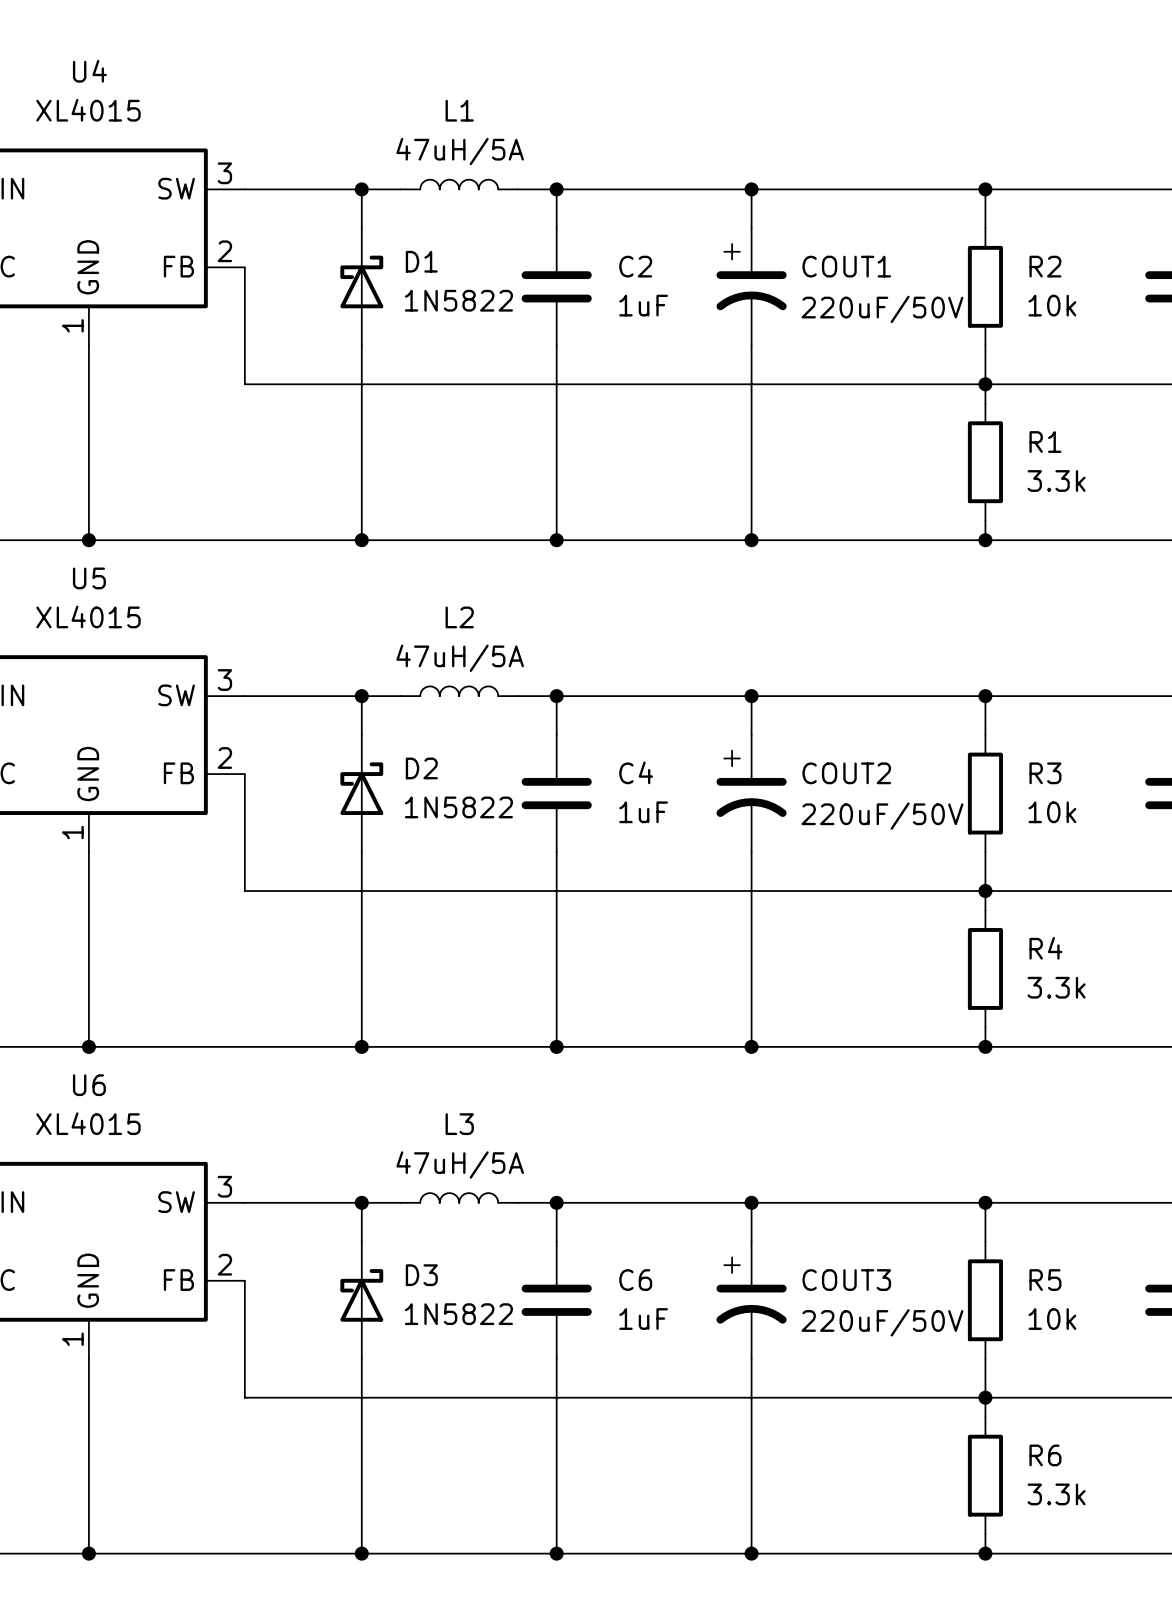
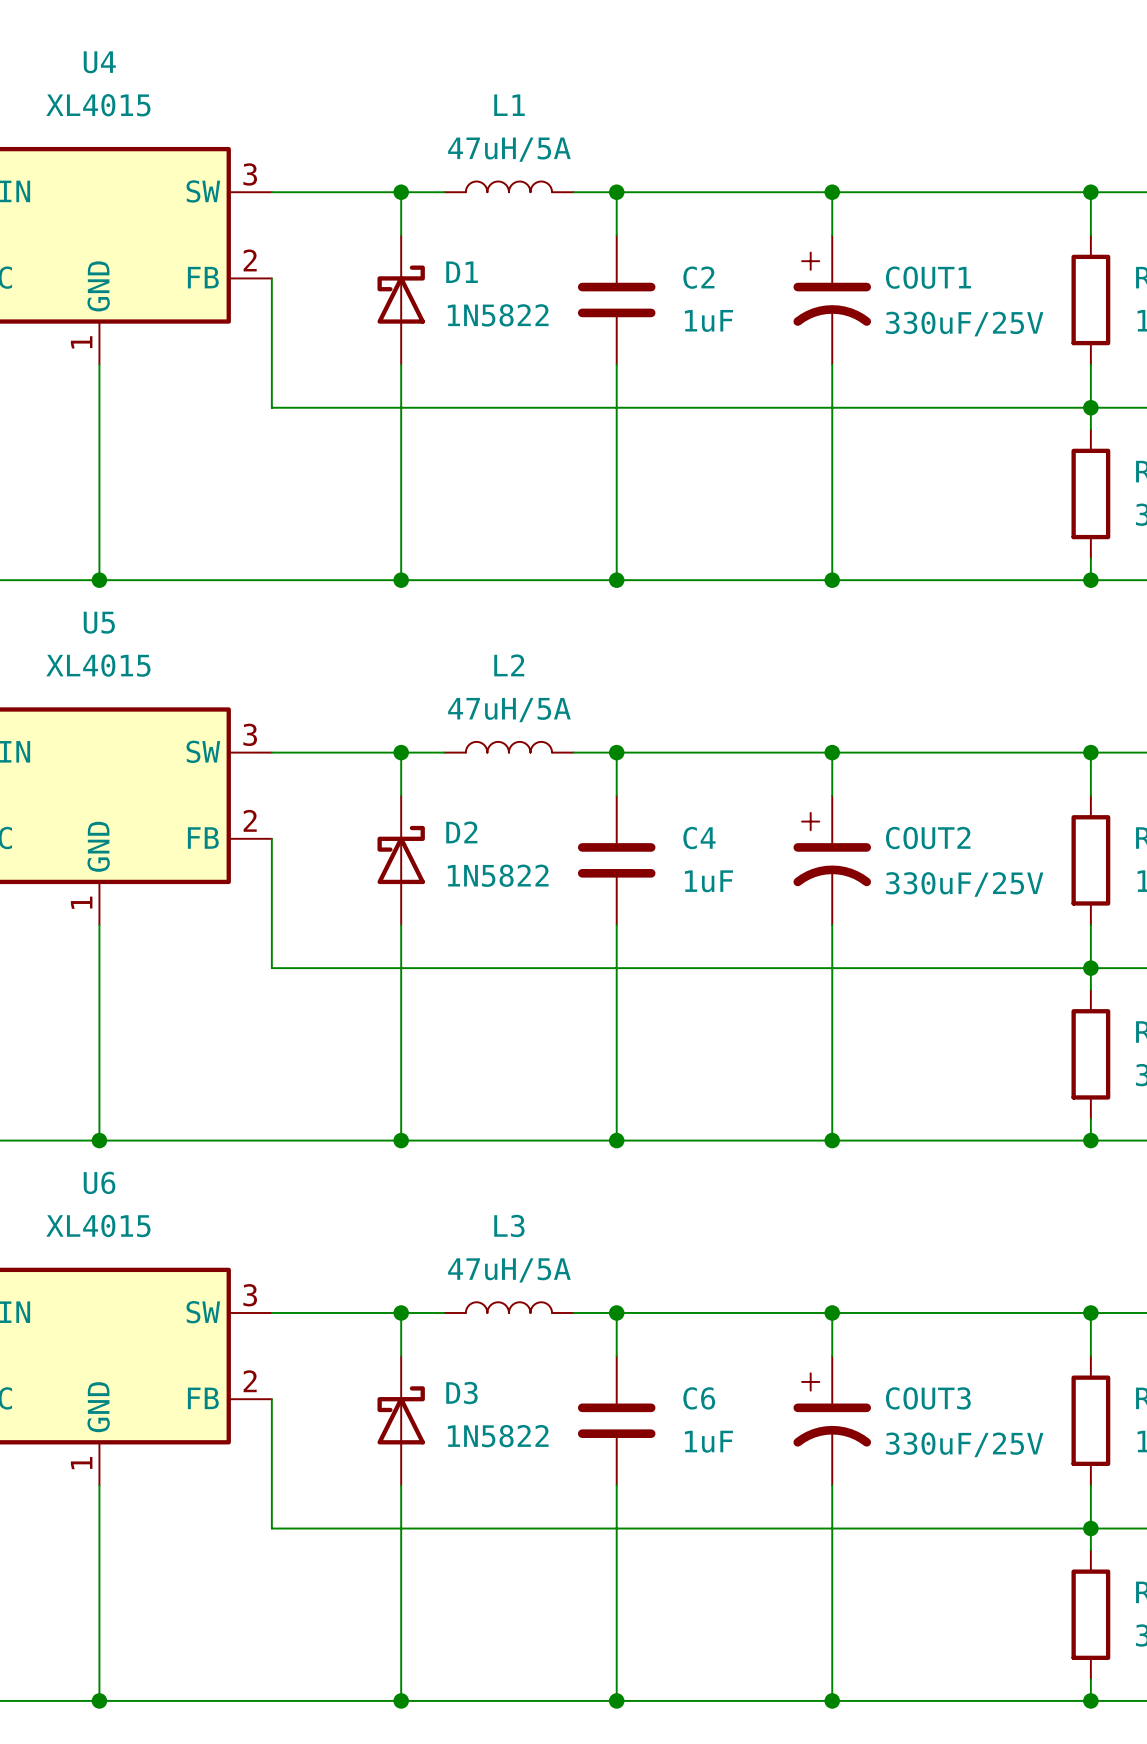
COUT1 value: 220uF/50V (882, 309) -> 330uF/25V (964, 324)
COUT2 value: 220uF/50V (882, 816) -> 330uF/25V (964, 884)
COUT3 value: 220uF/50V (882, 1322) -> 330uF/25V (964, 1444)

